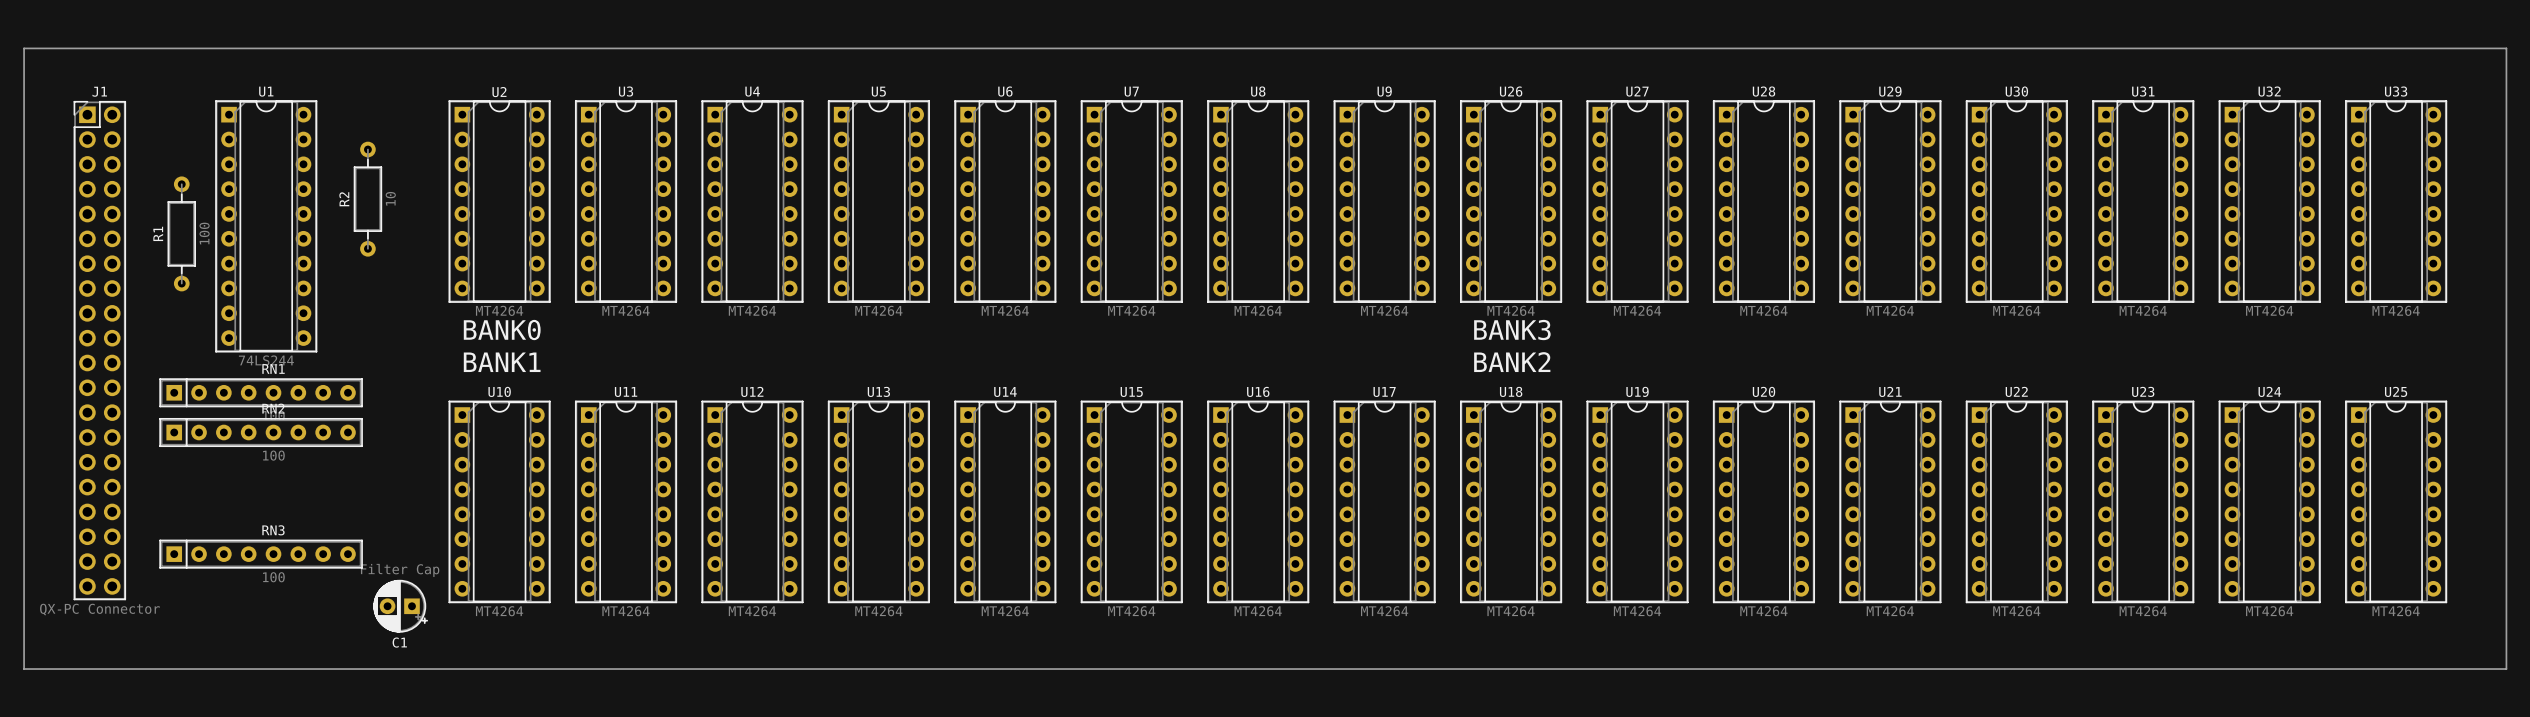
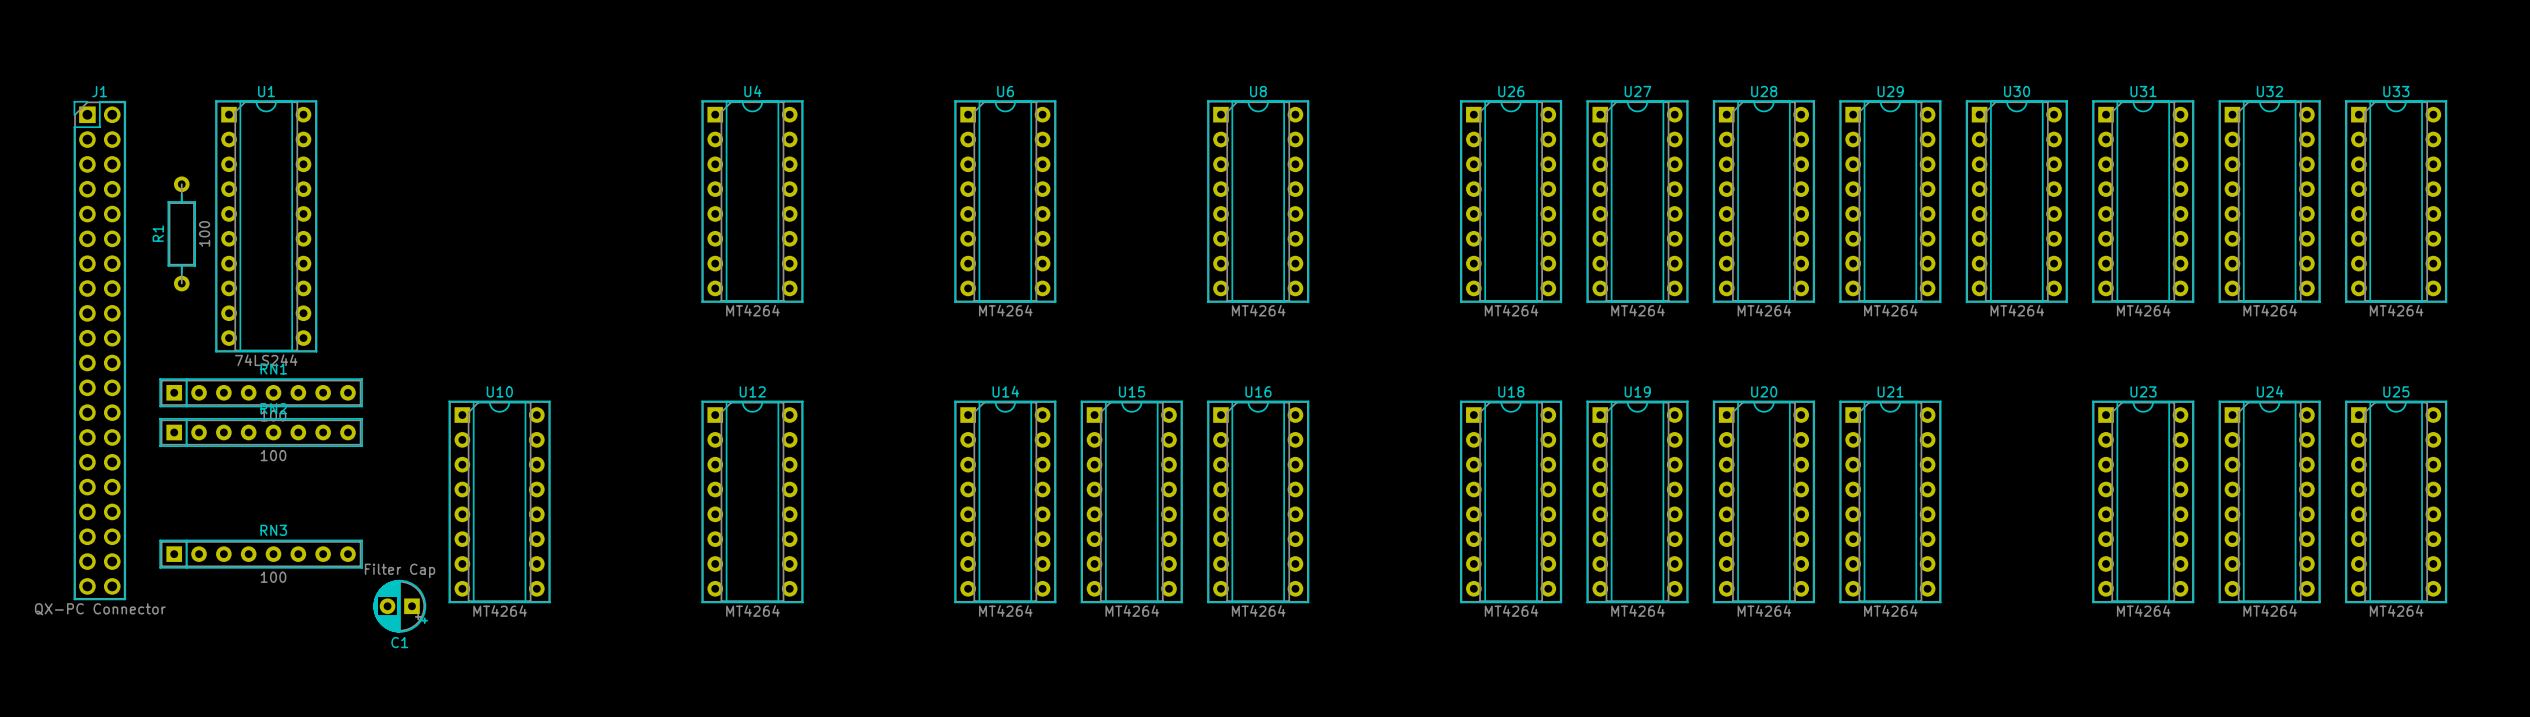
board edge: (24, 48) (24, 669) (2506, 669) (2506, 48) (24, 48) -> none
R2: 10 (367, 199) -> none
U2: MT4264 (499, 201) -> none
U3: MT4264 (626, 201) -> none
U5: MT4264 (878, 201) -> none
U7: MT4264 (1131, 201) -> none
U9: MT4264 (1384, 201) -> none
text: BANK0 (502, 330) -> none
text: BANK3 (1512, 330) -> none
text: BANK1 (502, 362) -> none
text: BANK2 (1512, 362) -> none
U11: MT4264 (626, 501) -> none
U13: MT4264 (878, 501) -> none
U17: MT4264 (1384, 501) -> none
U22: MT4264 (2016, 501) -> none

